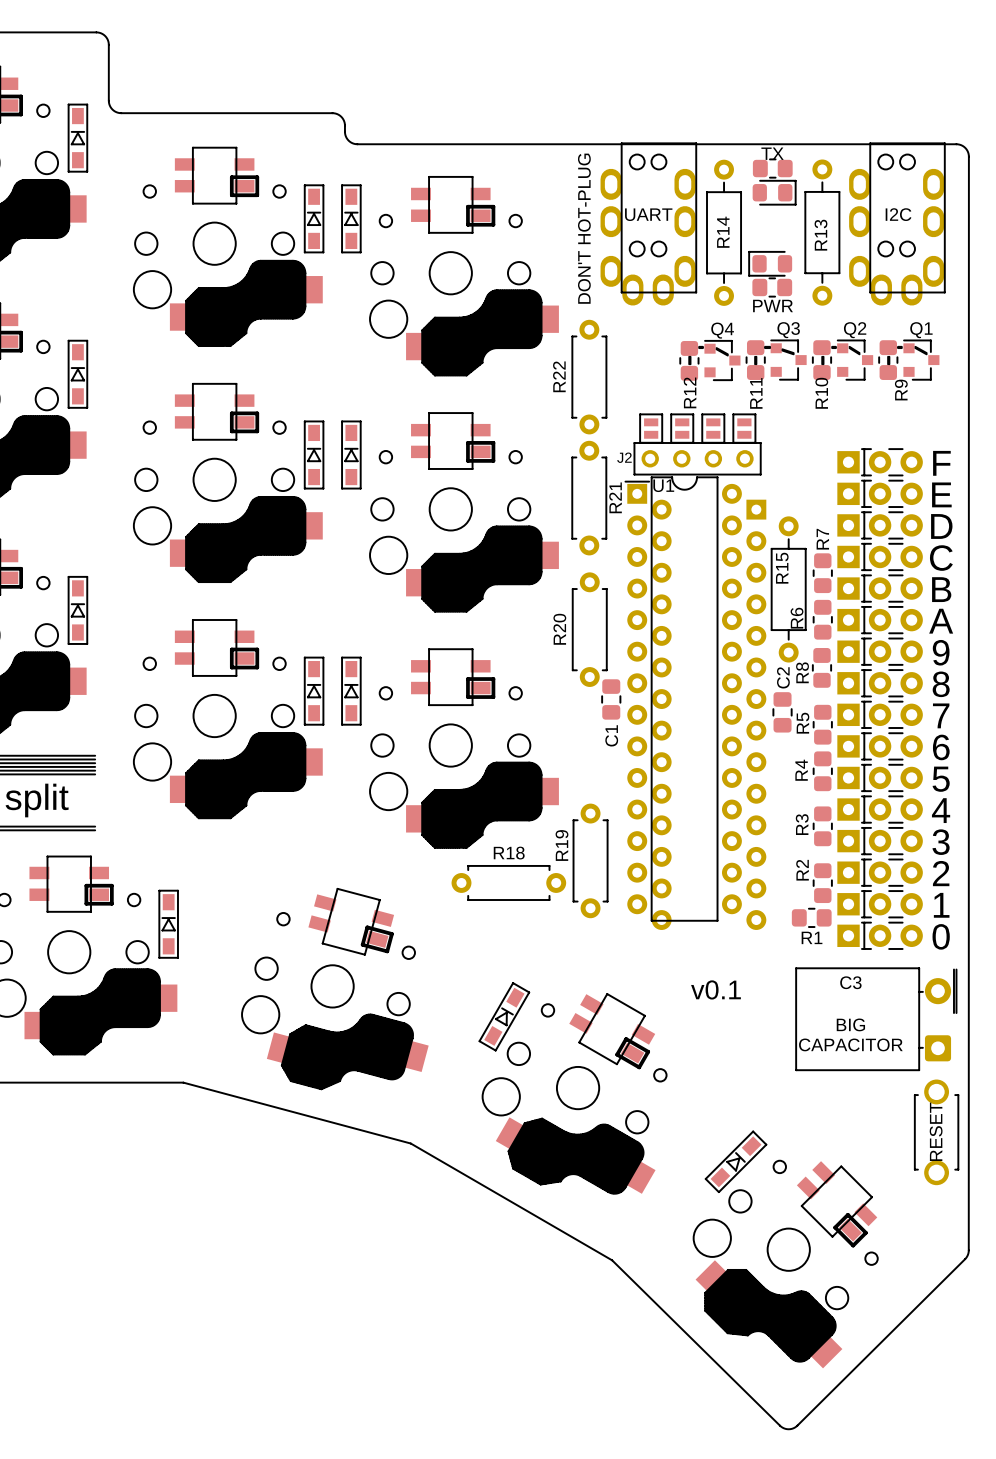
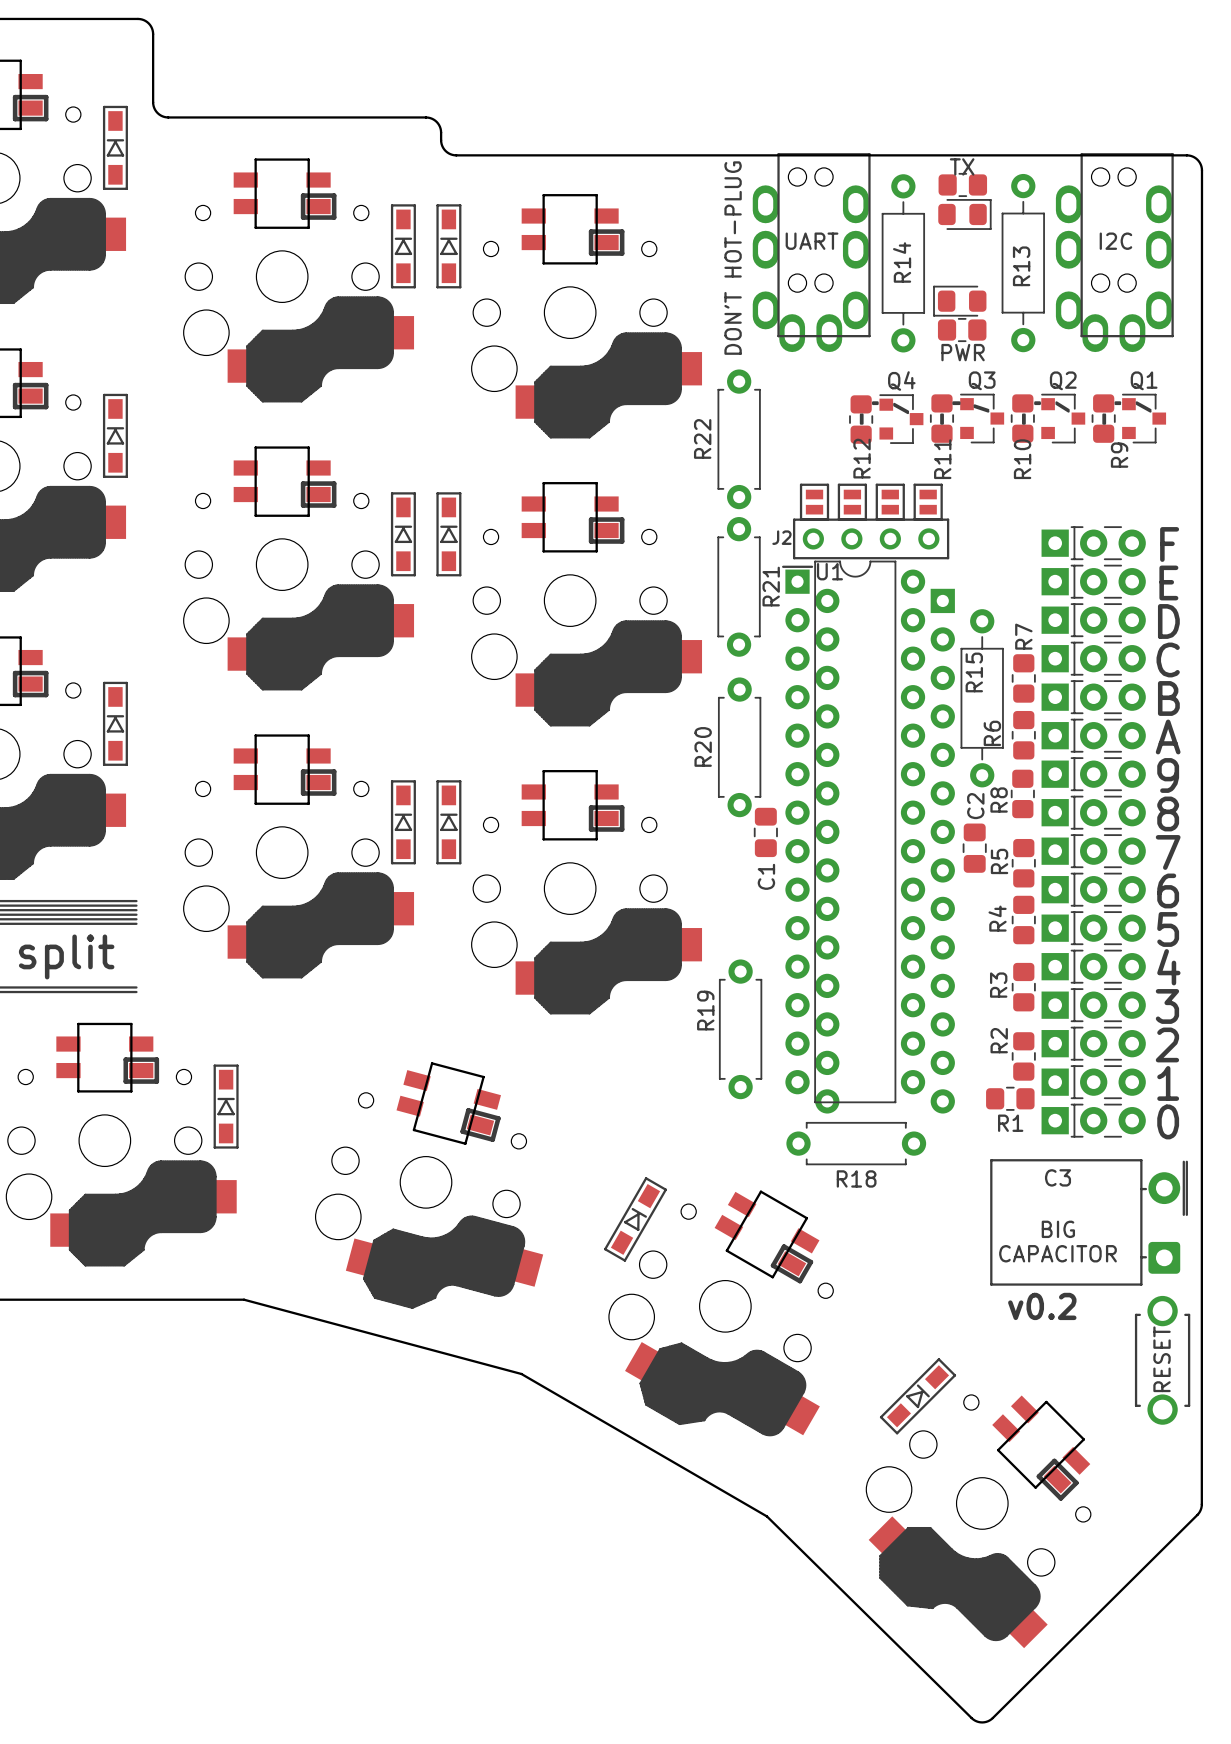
R18 name position: R18 (509, 853) -> R18 (856, 1178)
R18 position: (508, 882) -> (856, 1143)
text: v0.1 (715, 989) -> none
text: none -> v0.2 (1042, 1306)

